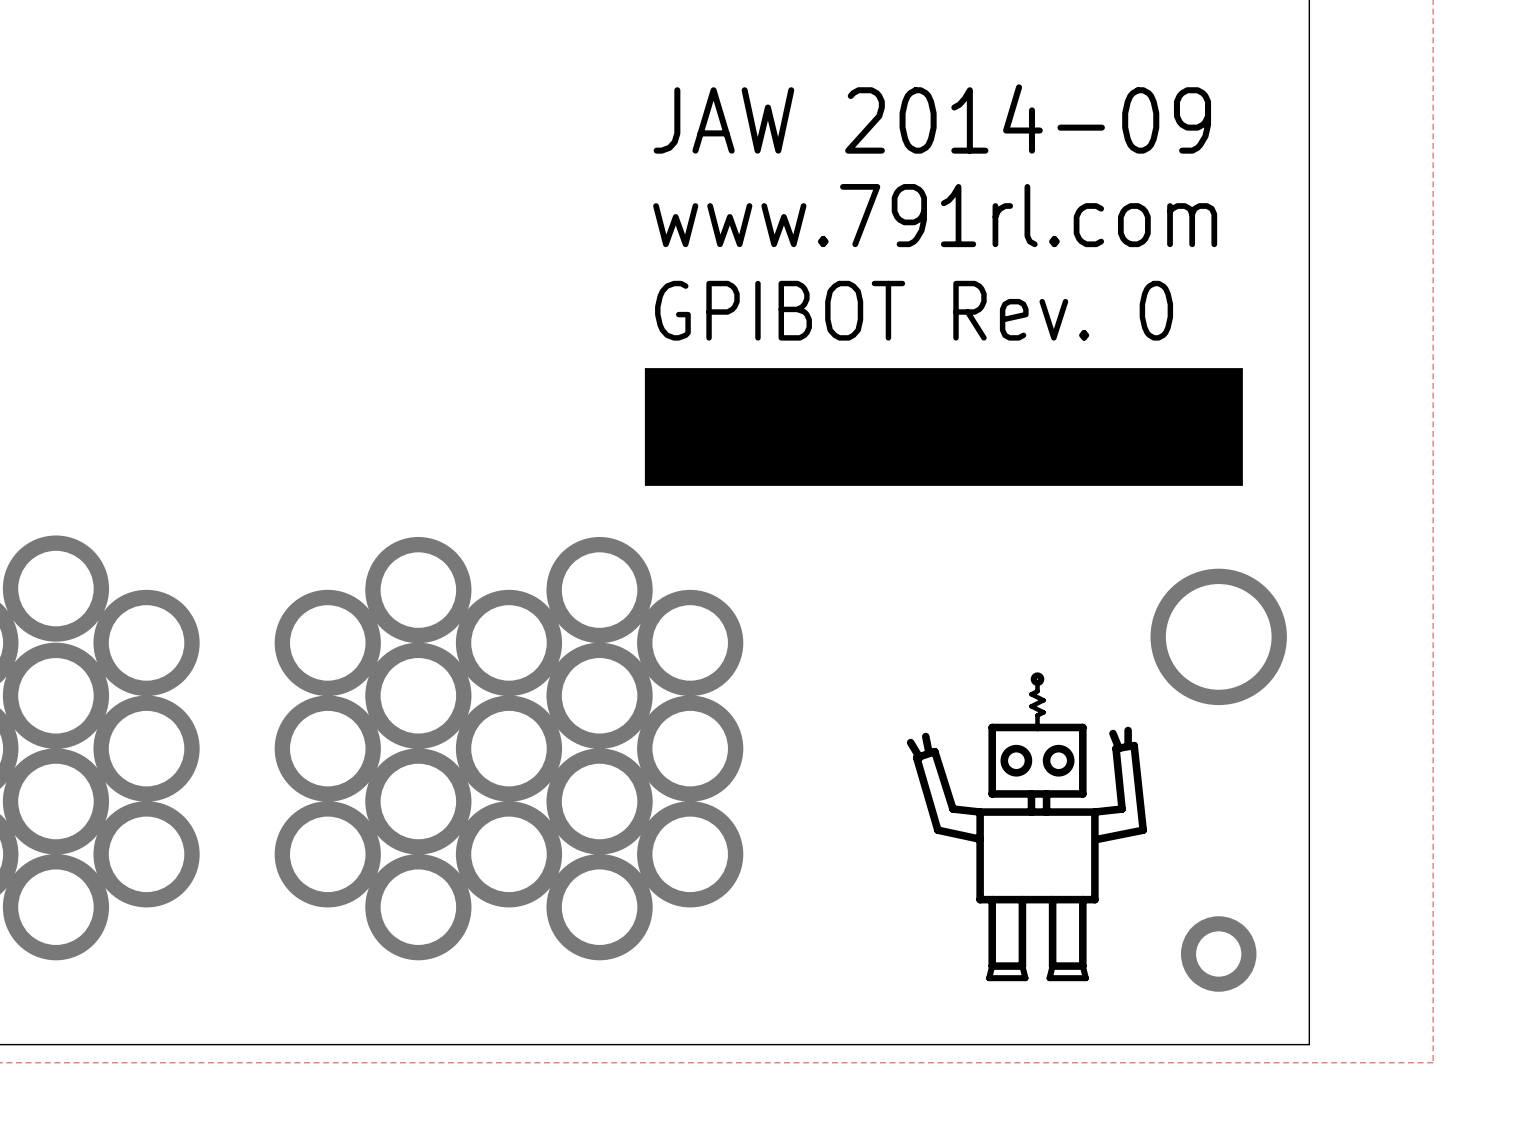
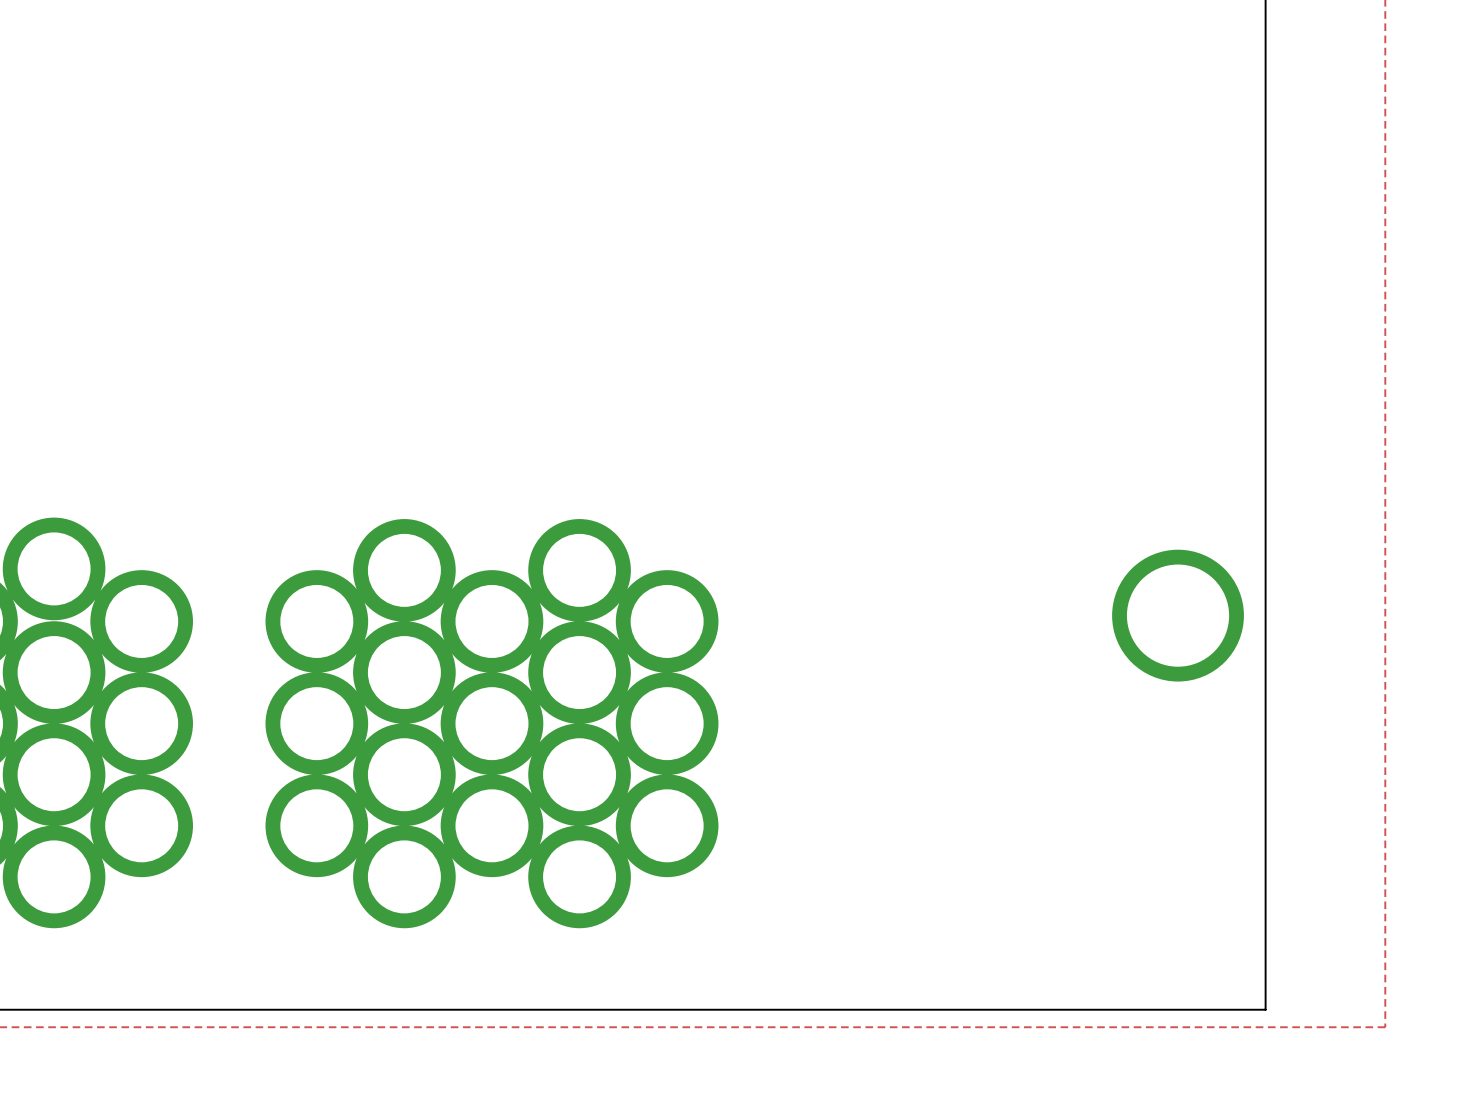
text: JAW 2014-09 (932, 119) -> none
text: www.791rl.com (935, 215) -> none
text: GPIBOT Rev. 0 (914, 310) -> none
drawing: [644, 368, 1243, 486] -> none
drawing: [906, 672, 1147, 982] -> none
via: (1218, 954) -> none

